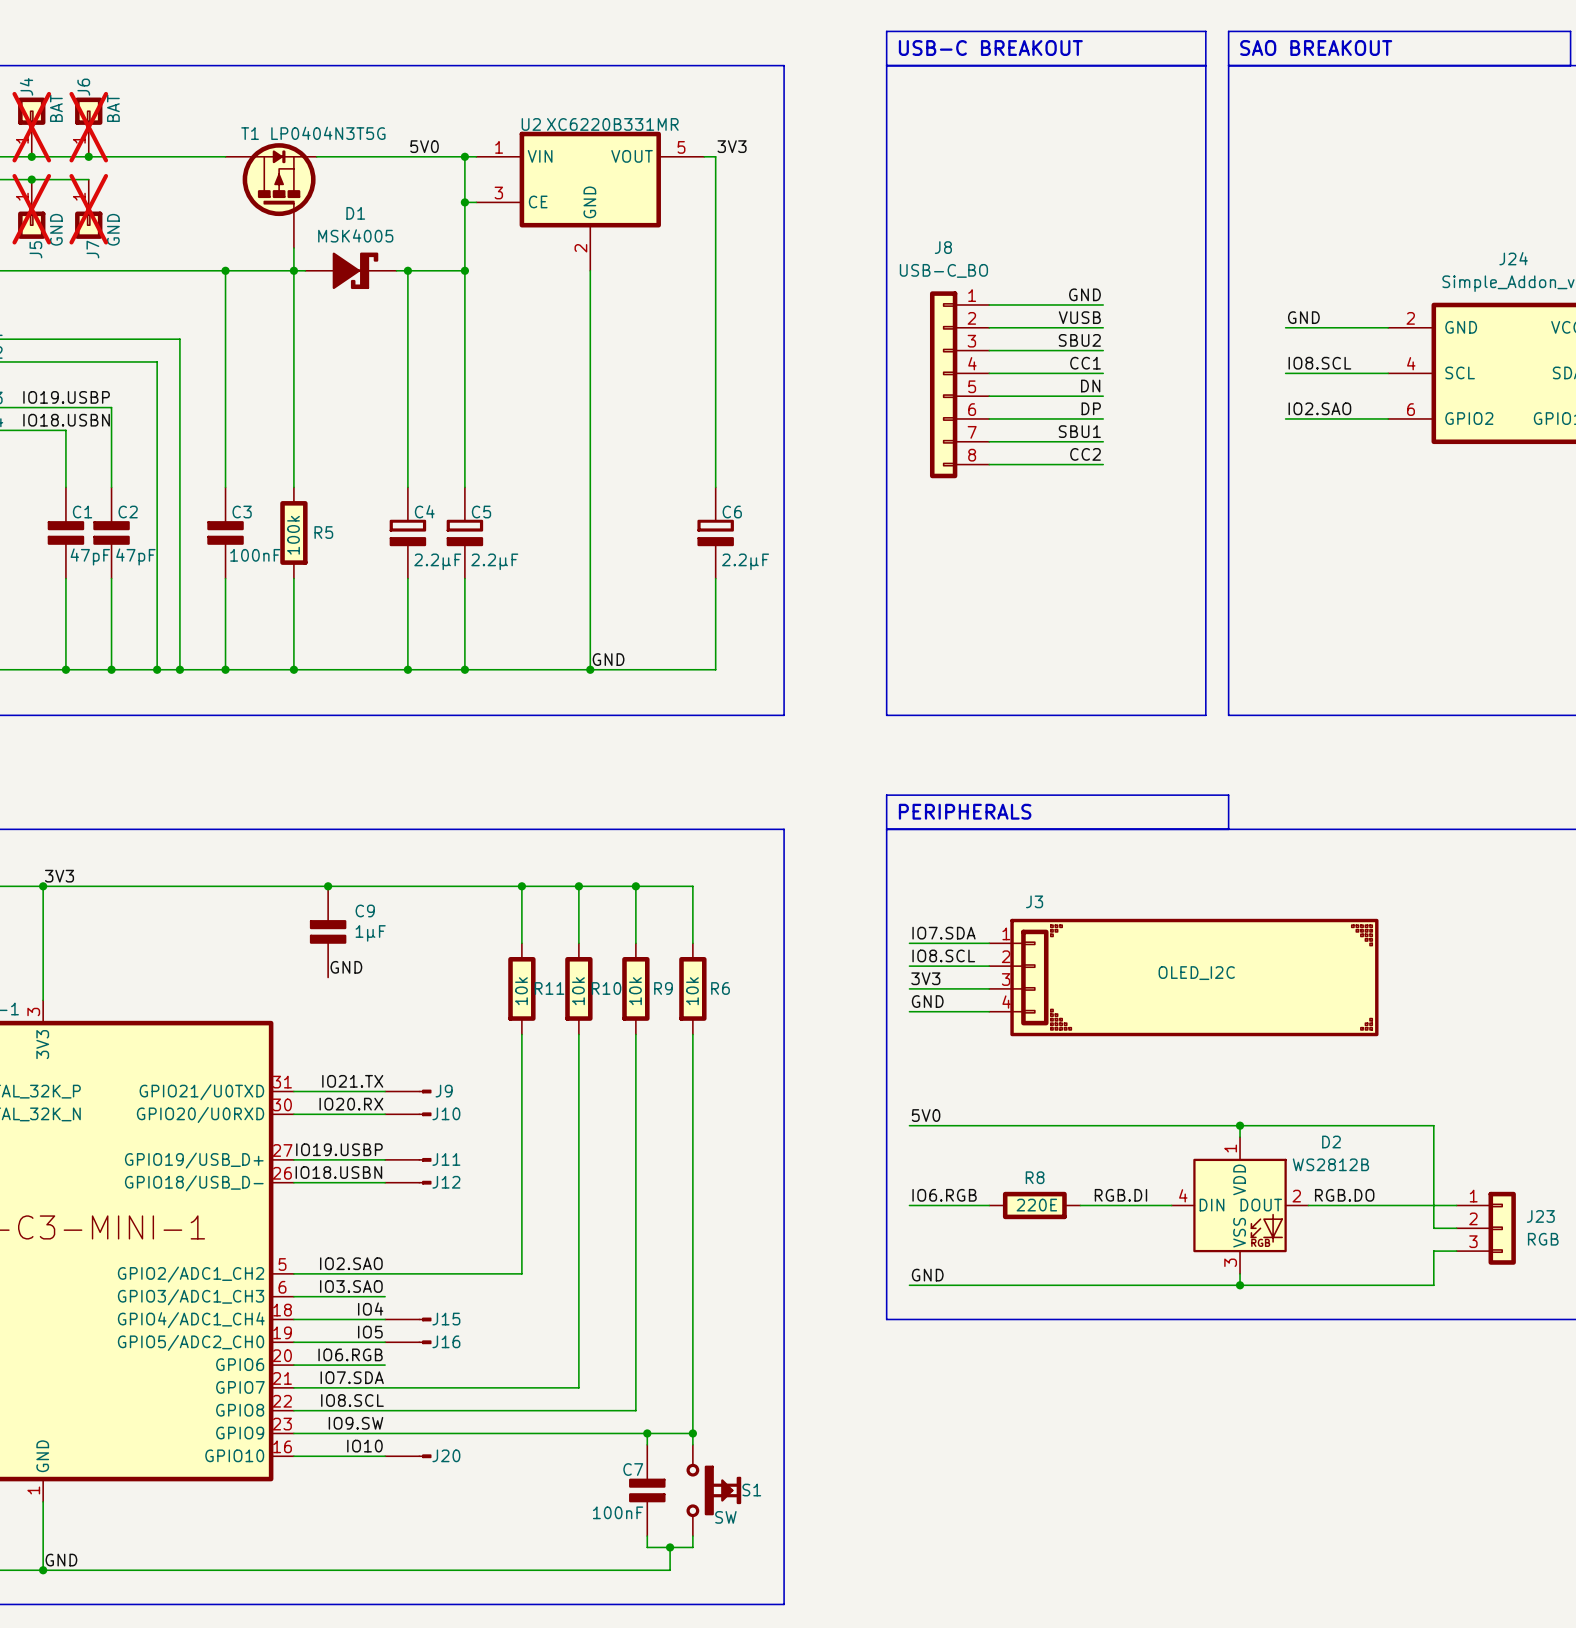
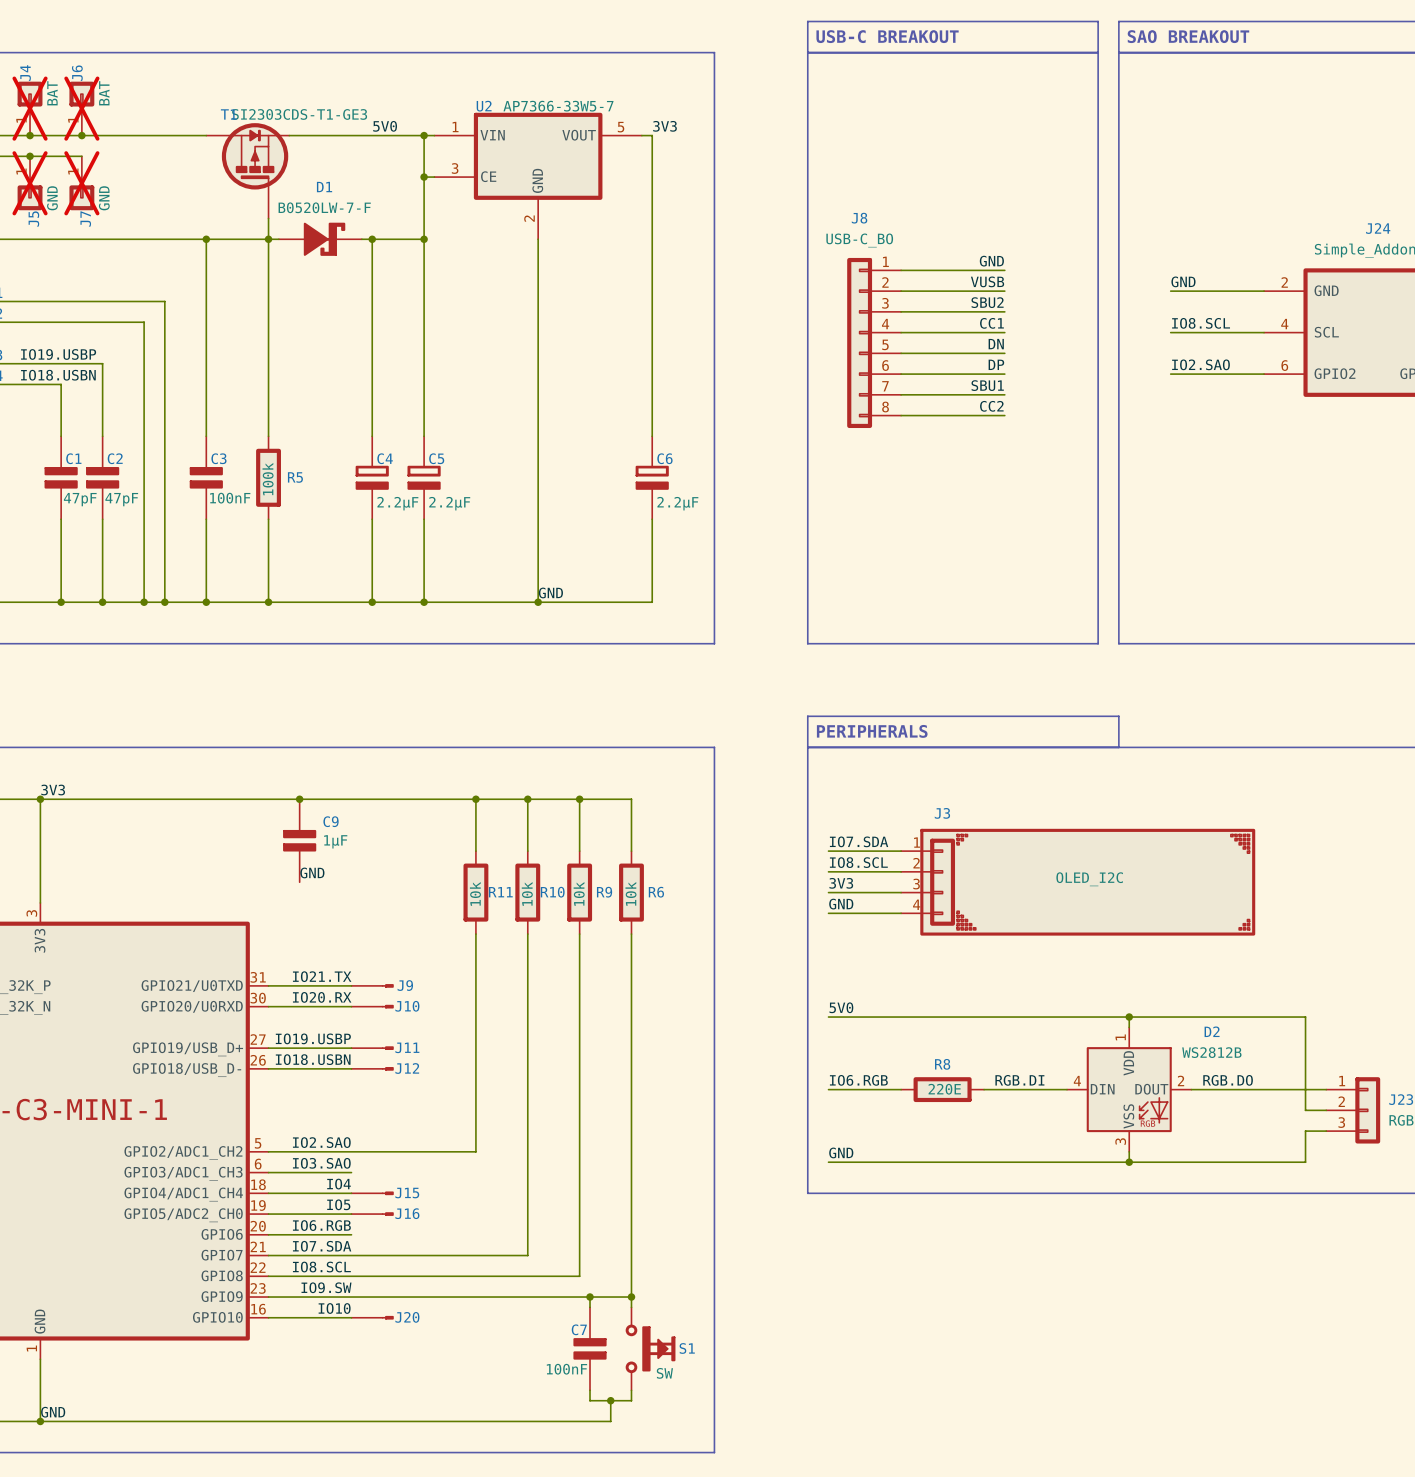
U2 value: XC6220B331MR (612, 124) -> AP7366-33W5-7 (558, 106)
T1 value: LP0404N3T5G (328, 133) -> SI2303CDS-T1-GE3 (299, 114)
D1 value: MSK4005 (355, 235) -> B0520LW-7-F (324, 207)

